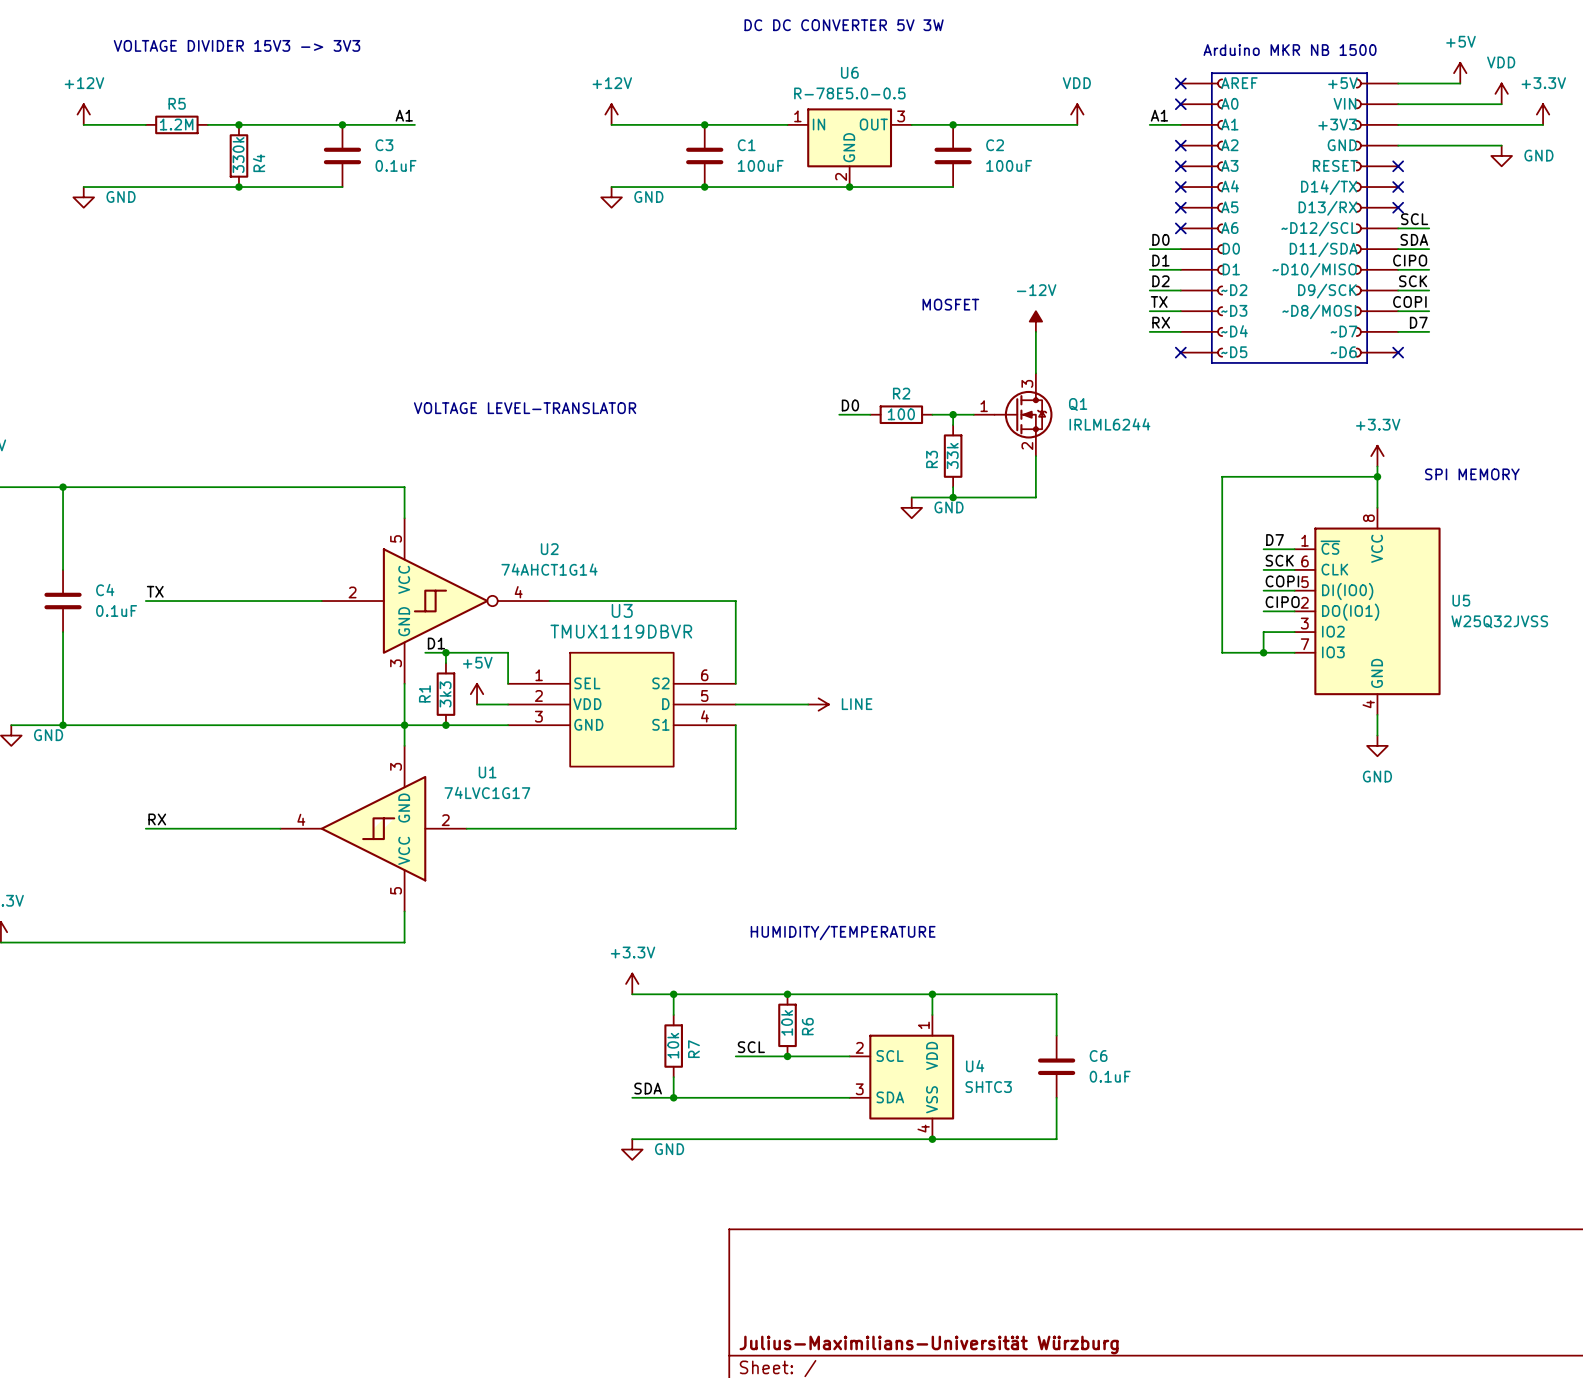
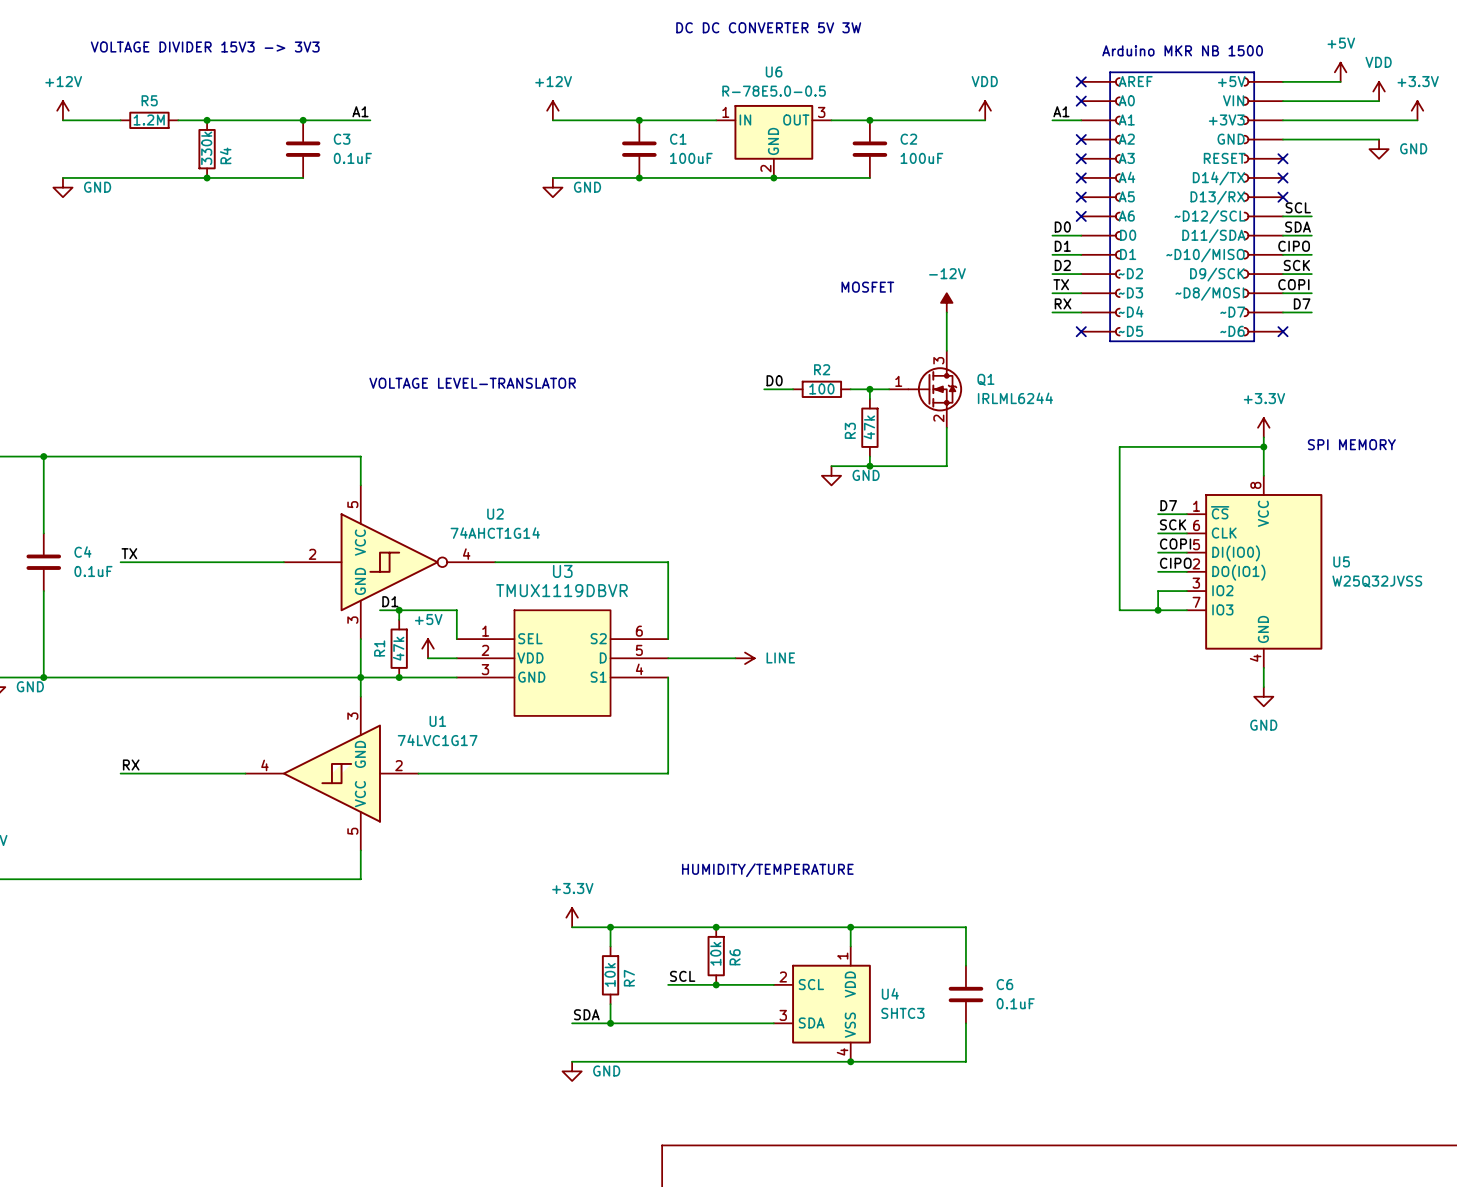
R3 value: 33k (952, 455) -> 47k (869, 427)
R1 value: 3k3 (445, 694) -> 47k (398, 648)

